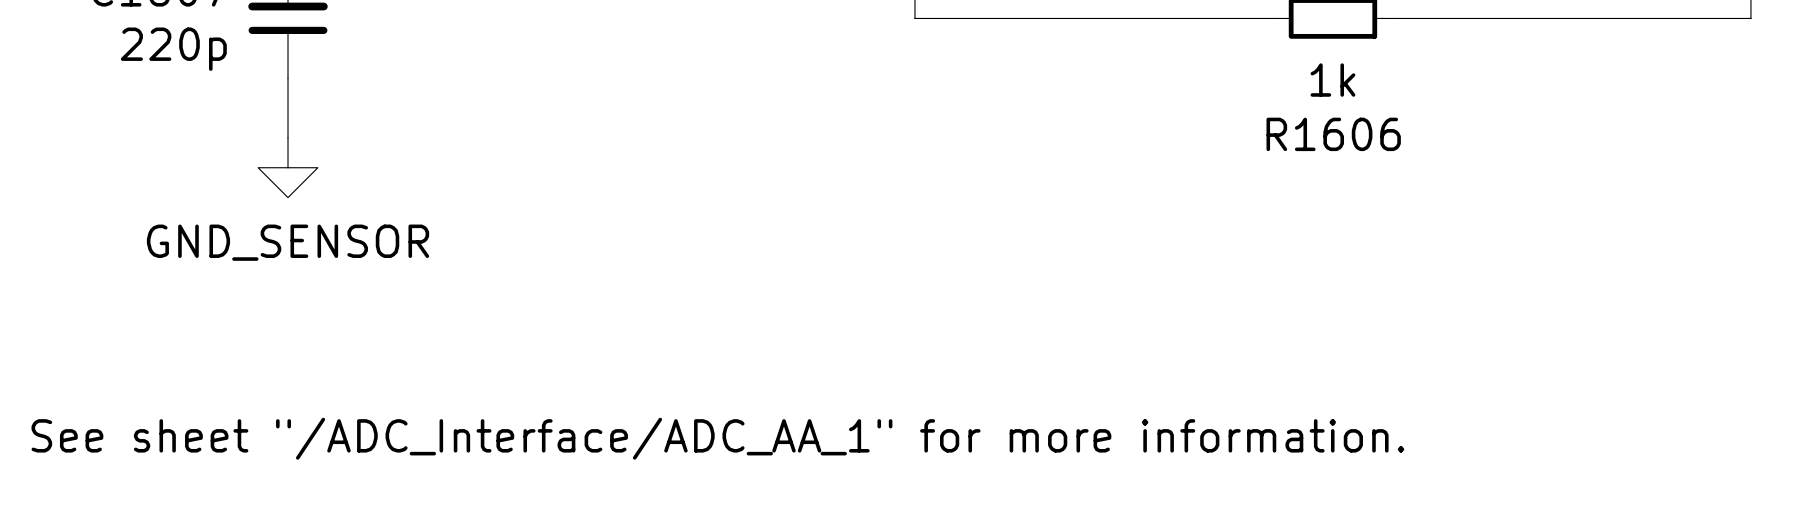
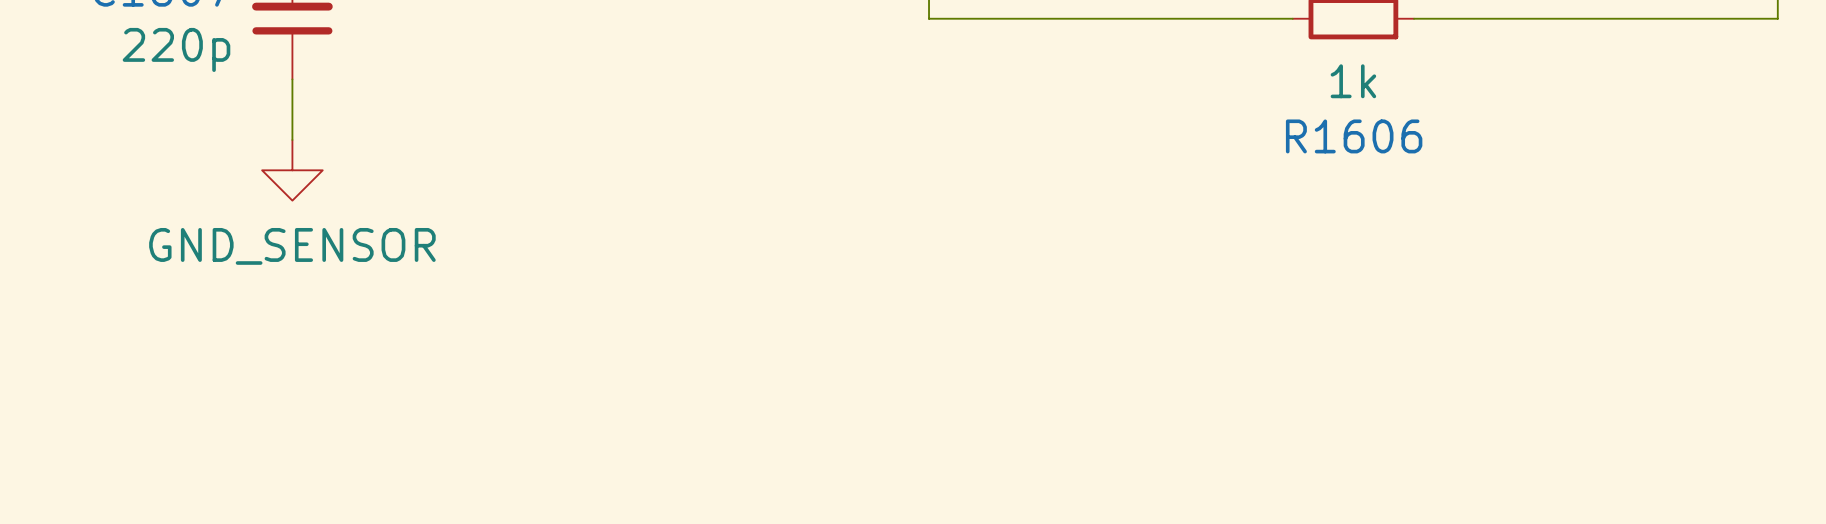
text: See sheet "/ADC_Interface/ADC_AA_1" for more information. (717, 438) -> none

